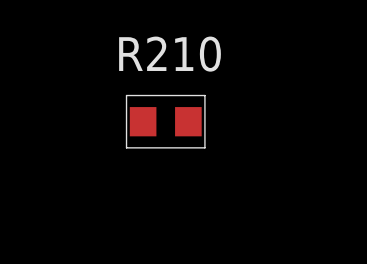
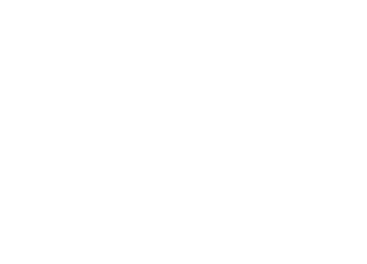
R210: (165, 121) -> none

